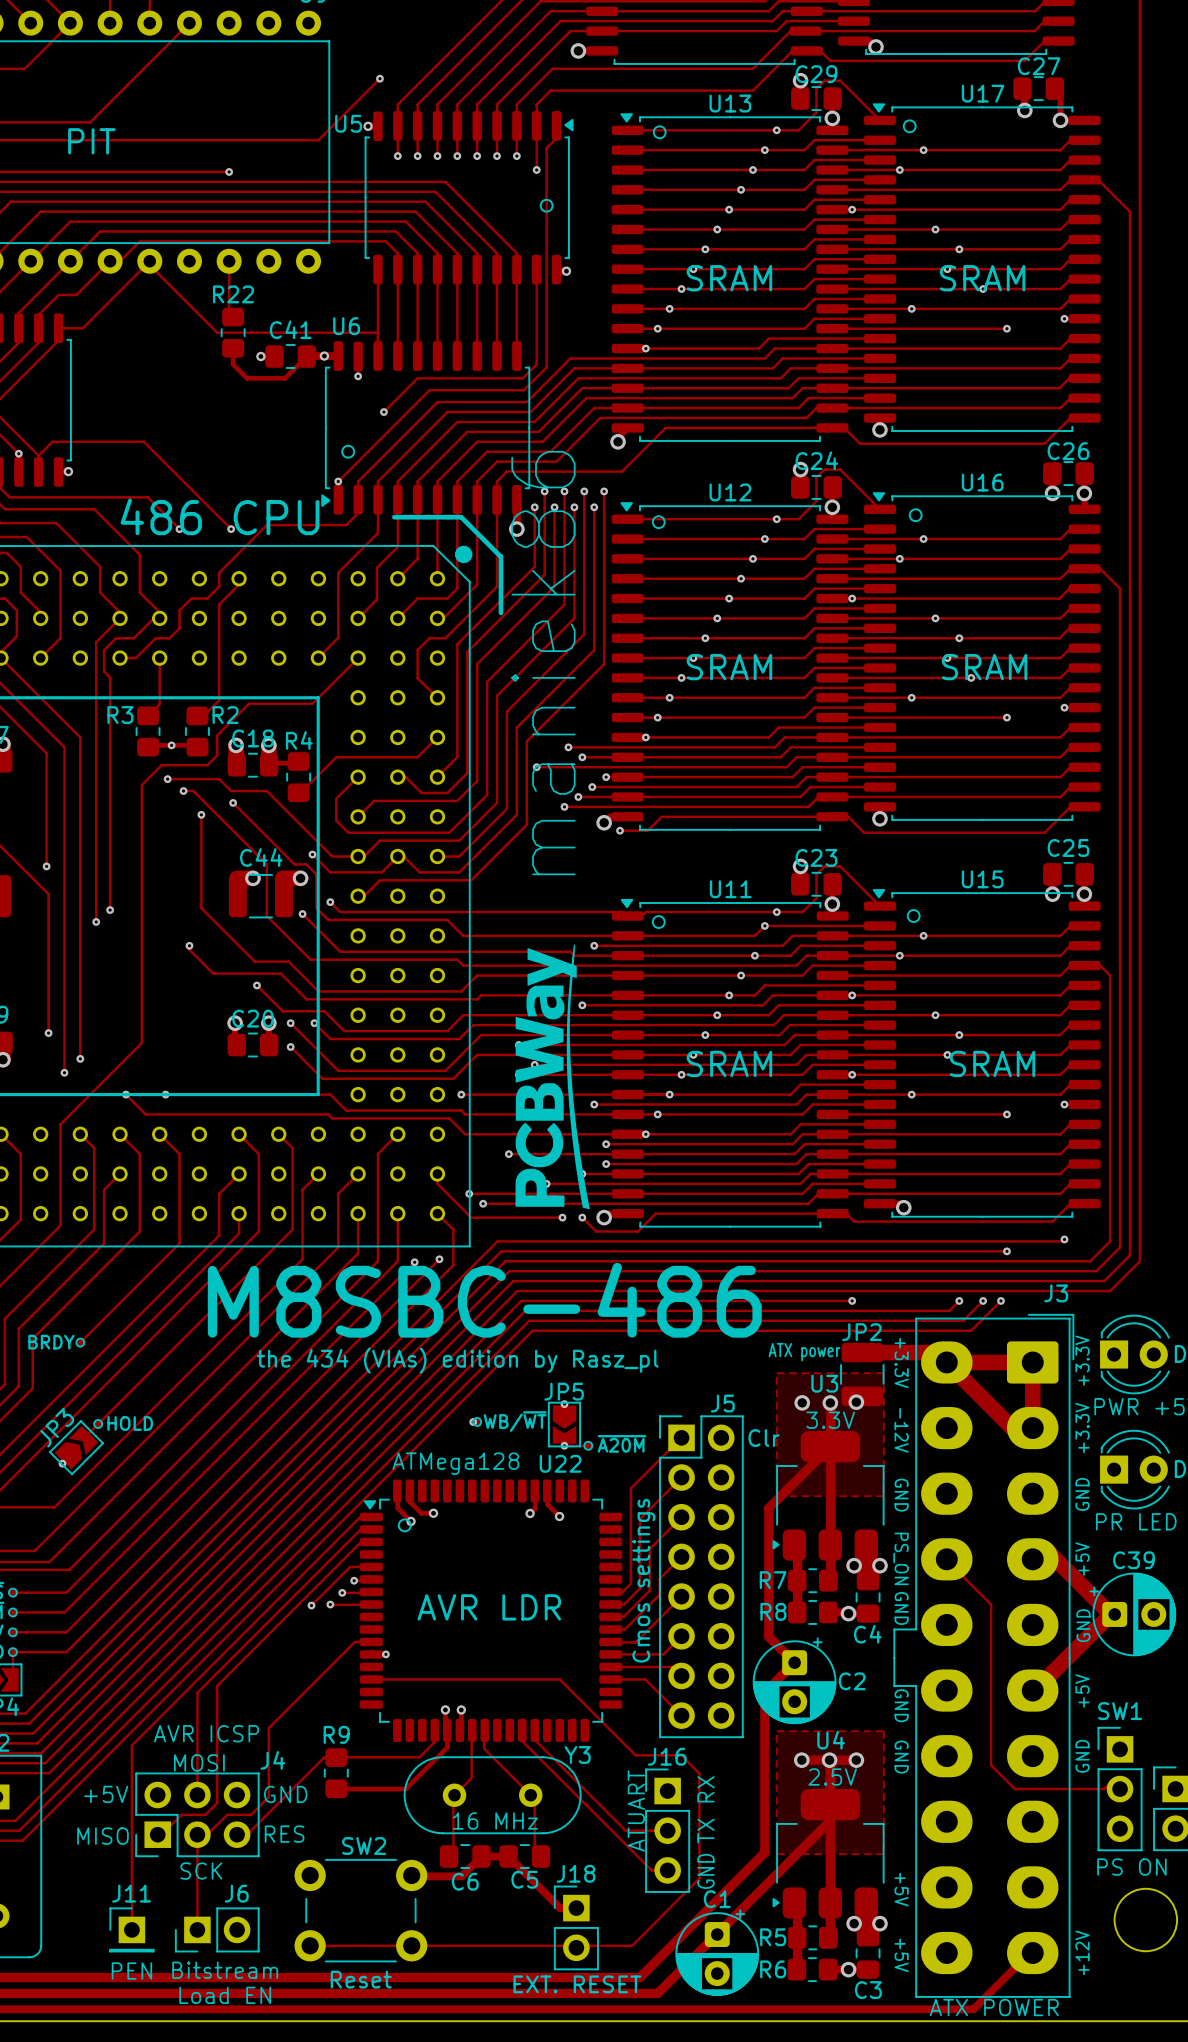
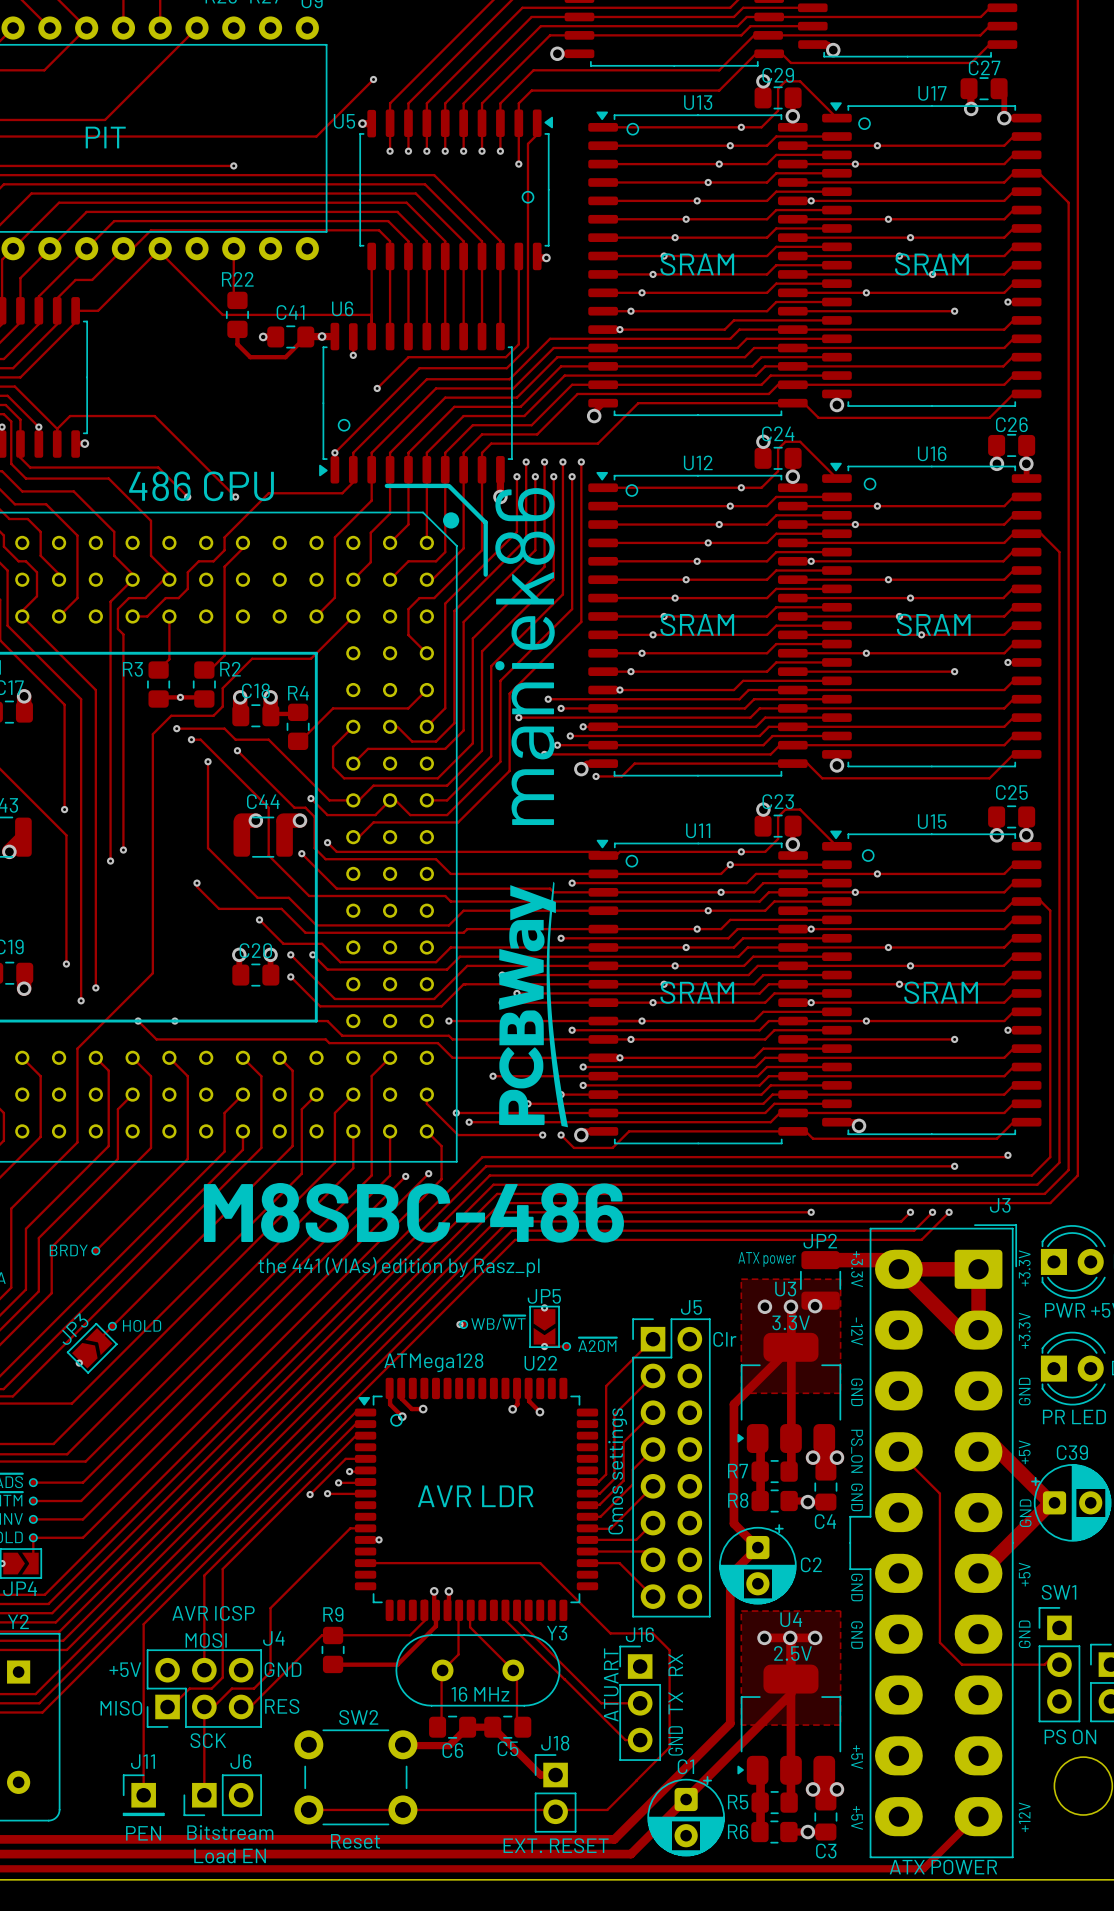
text: the 434 (VIAs) edition by Rasz_pl (457, 1360) -> the 441 (VIAs) edition by Rasz_pl (398, 1267)

